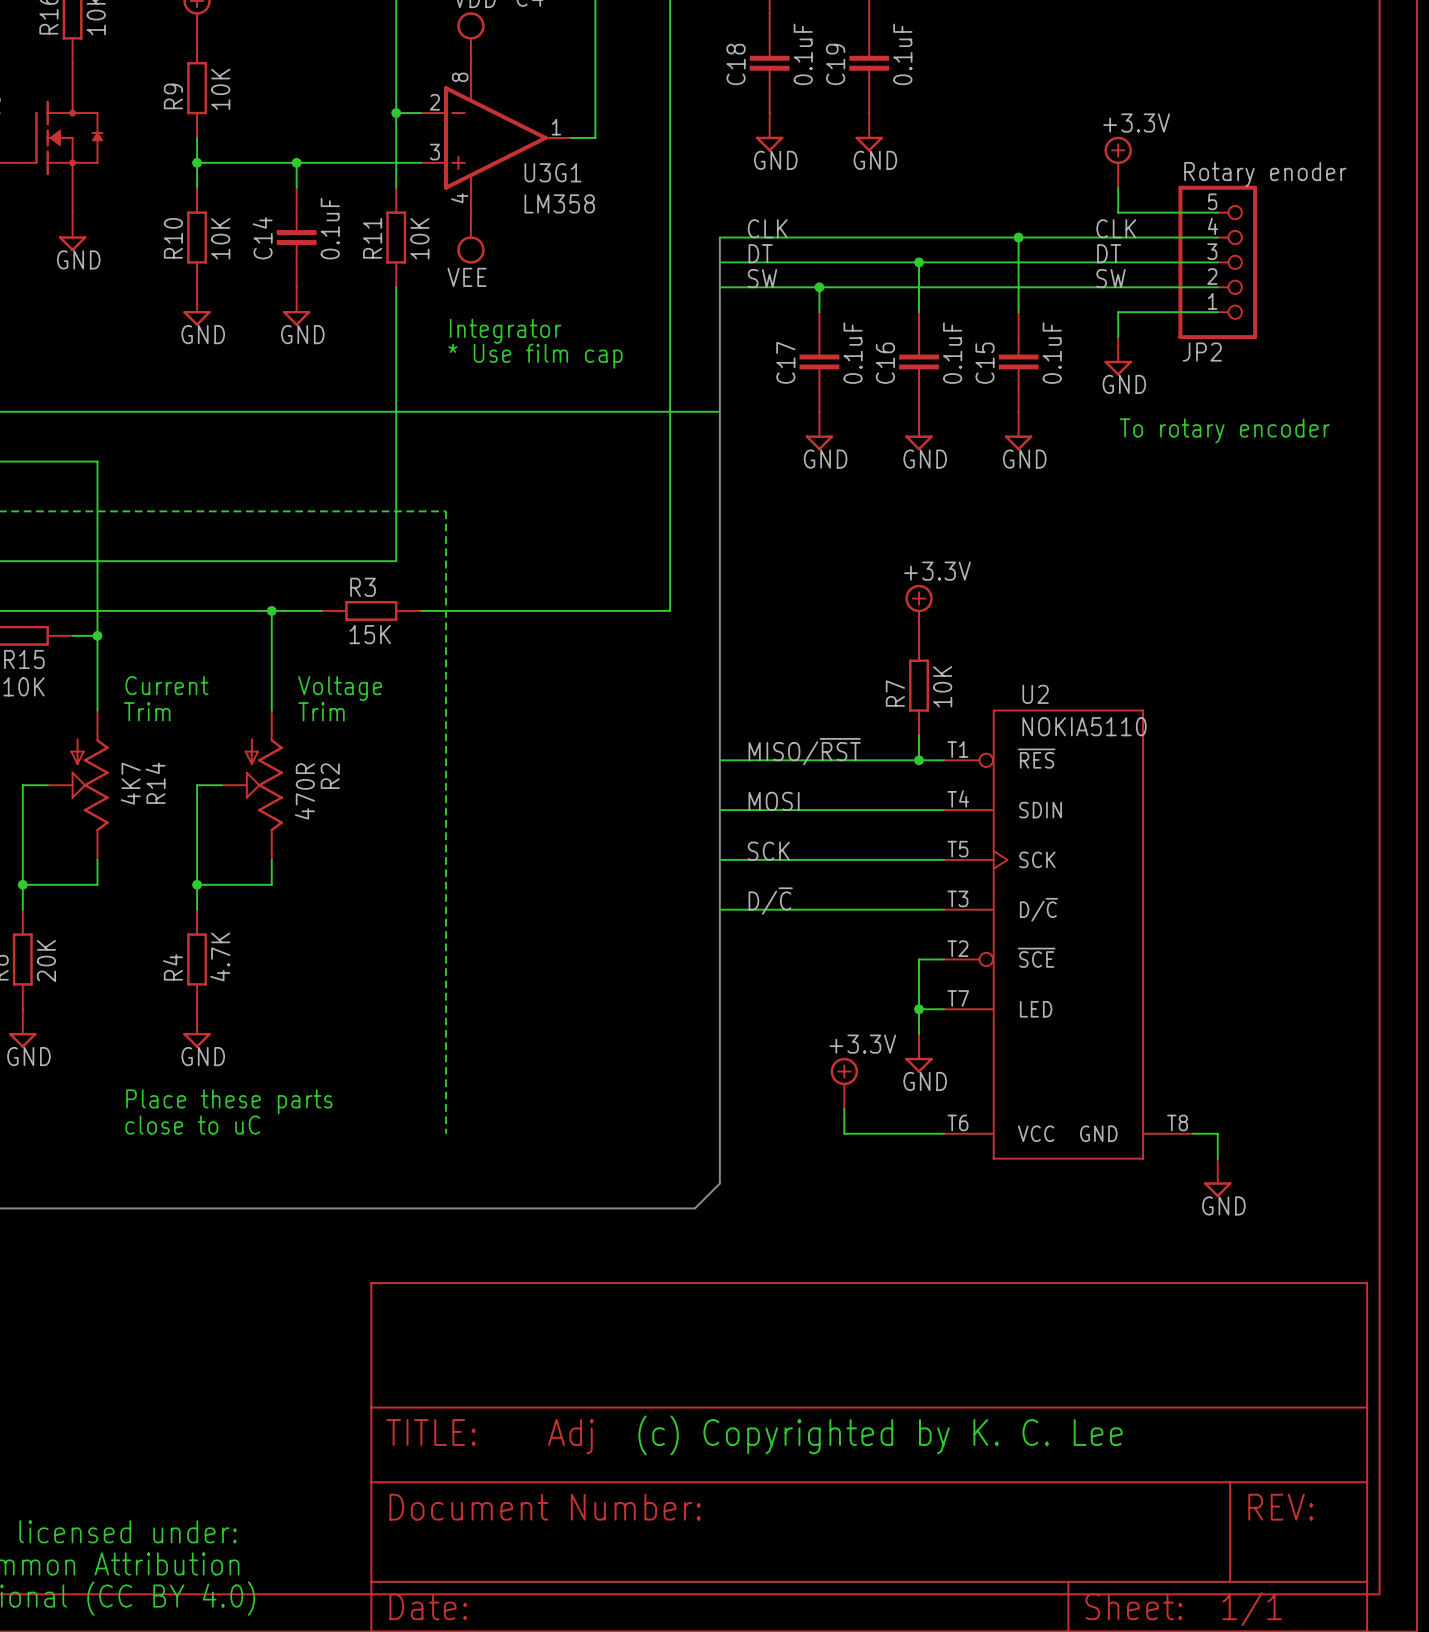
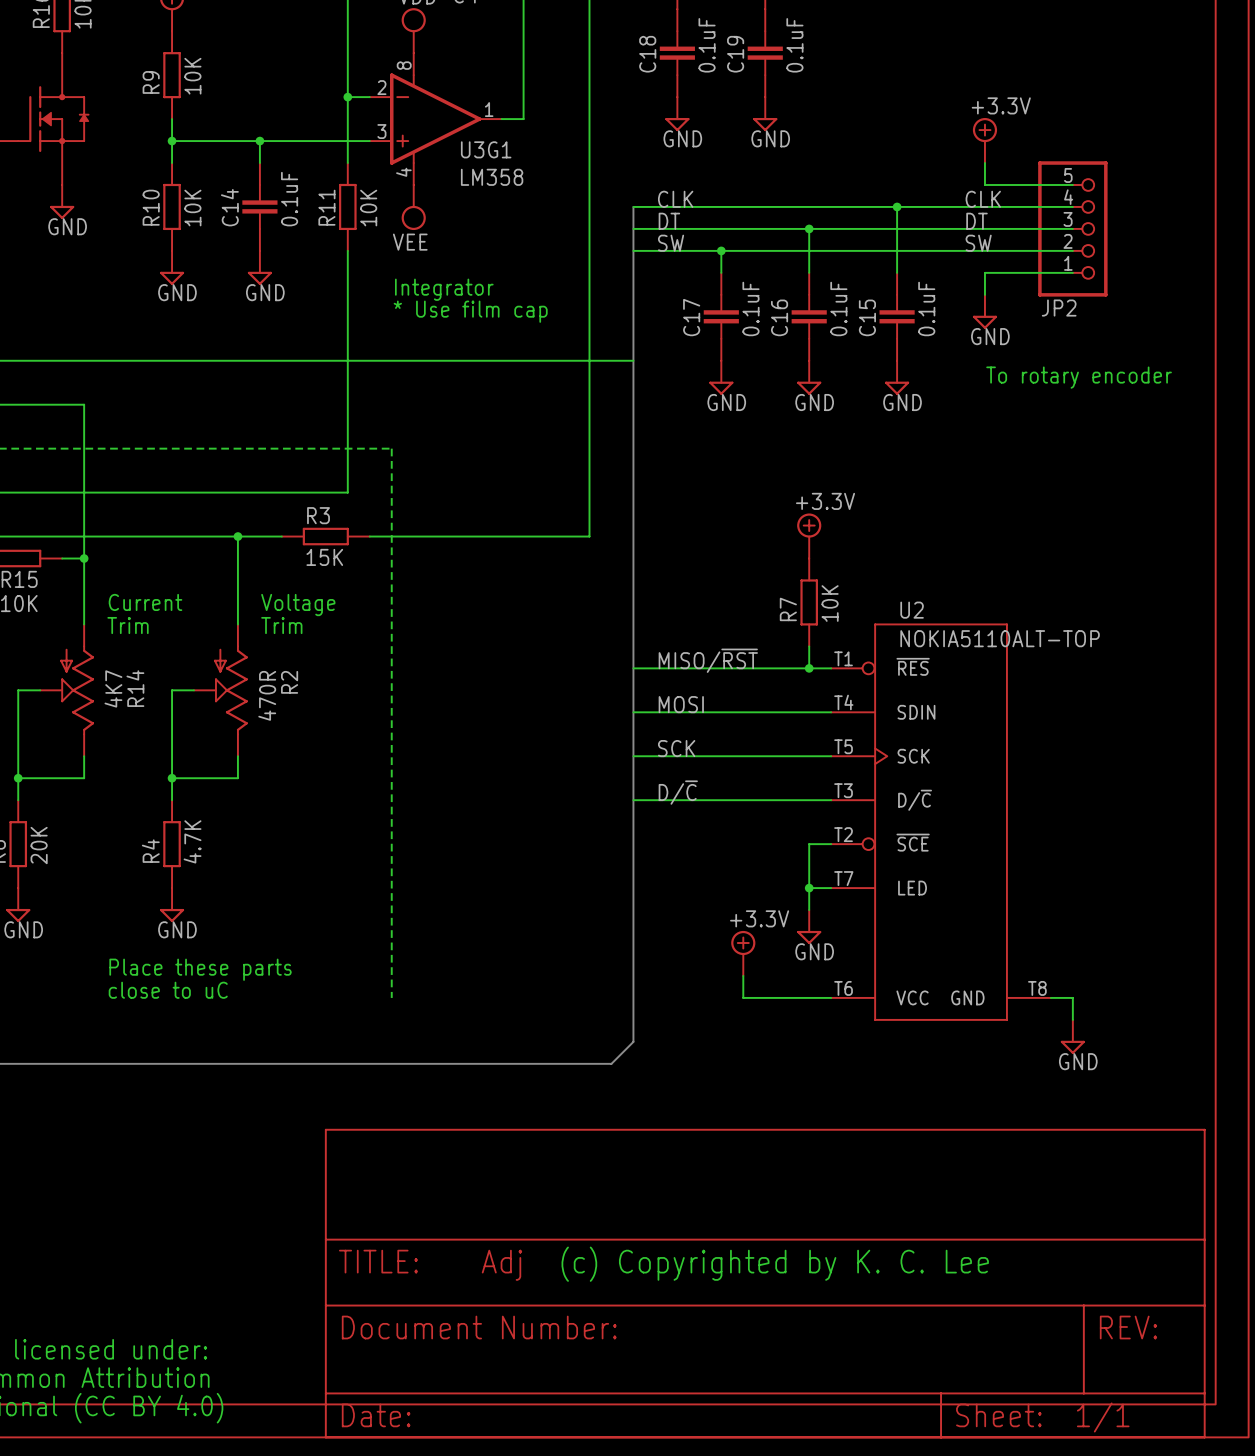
JP2 value: Rotary enoder (1265, 174) -> none
U2 value: NOKIA5110 (1084, 726) -> NOKIA5110ALT-TOP (1000, 638)

